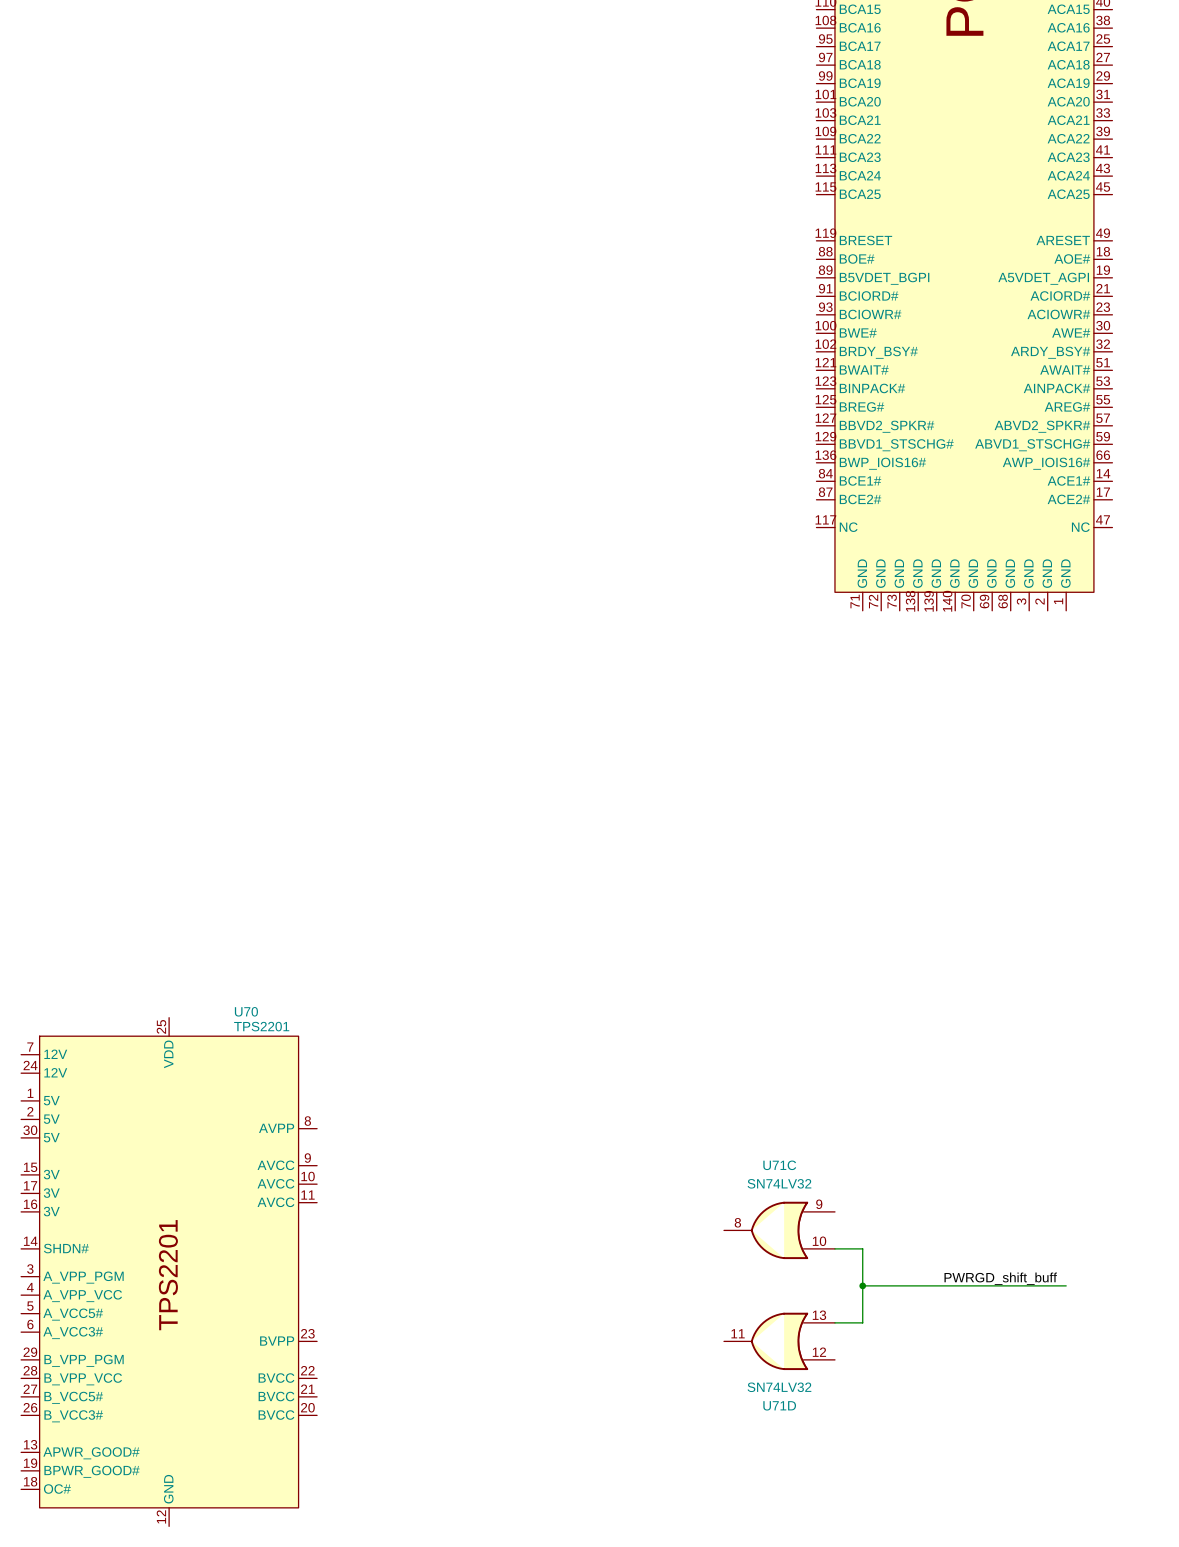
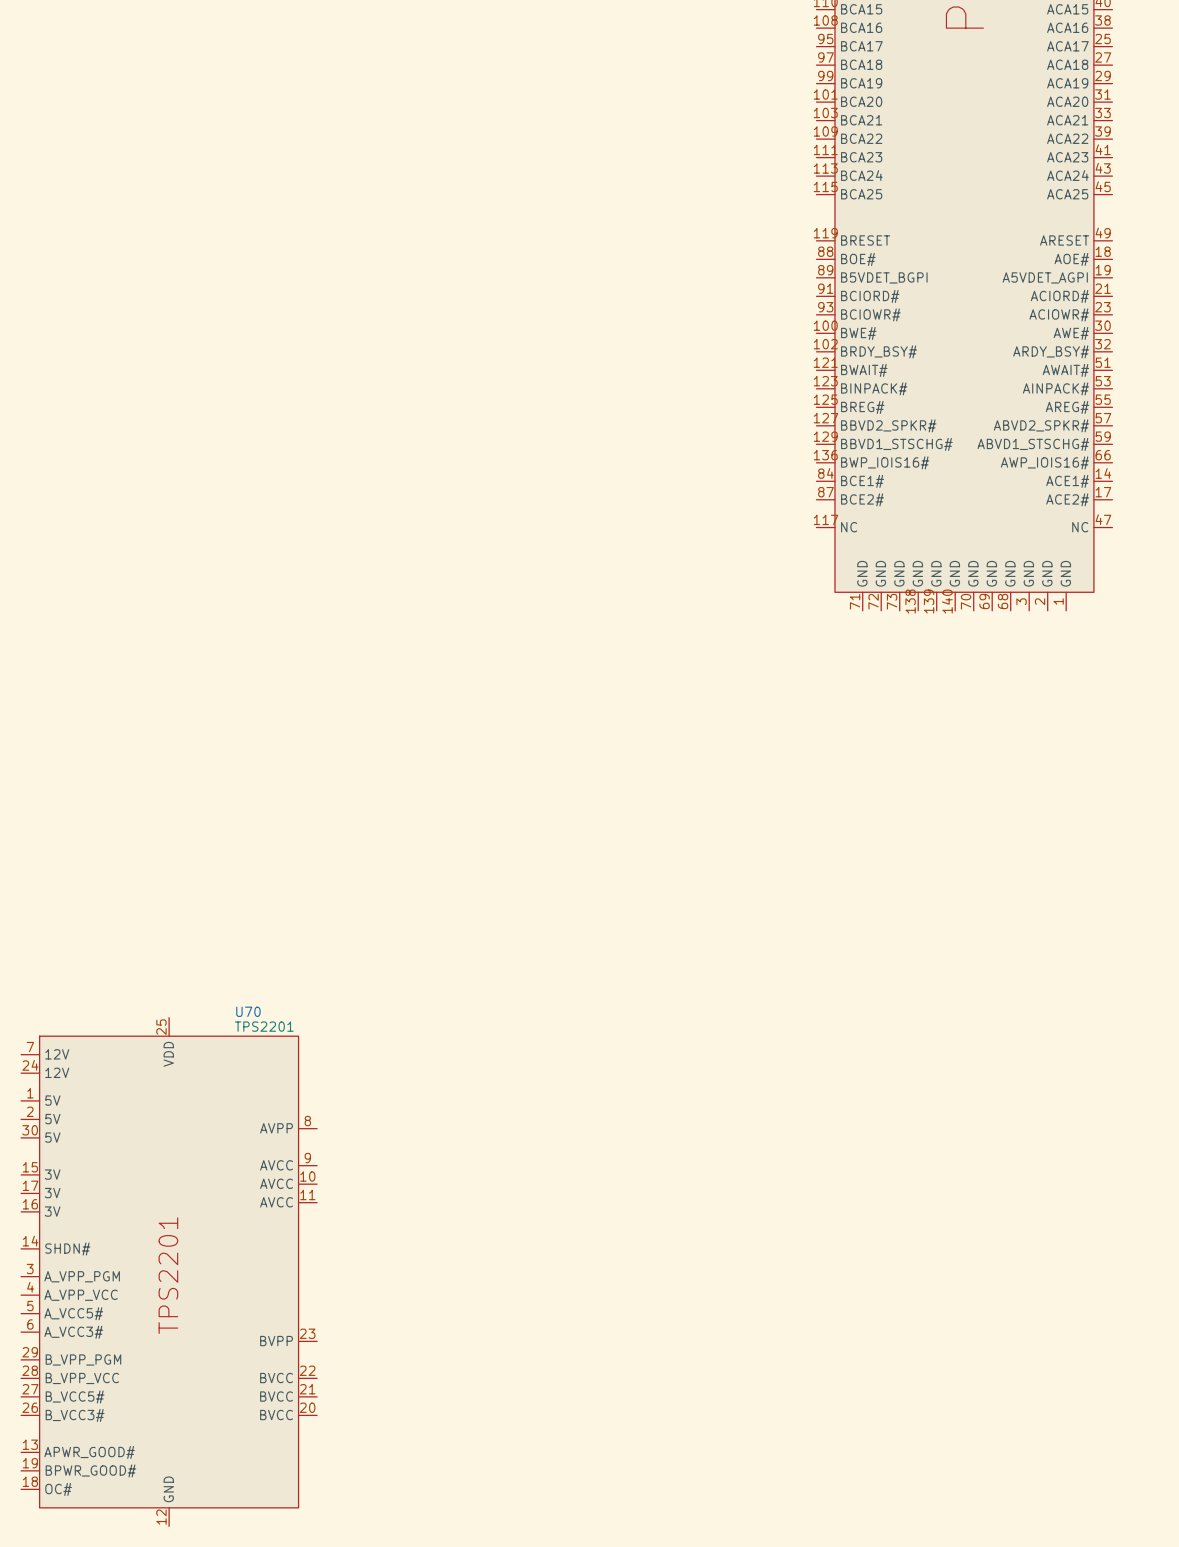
U71C: SN74LV32 (779, 1230) -> none
wire: (834, 1248) (862, 1248) (862, 1322) (834, 1322) -> none
label: PWRGD_shift_buff (1000, 1278) -> none
wire: (862, 1285) (1066, 1285) -> none
junction: (862, 1285) -> none
U71D: SN74LV32 (779, 1341) -> none

